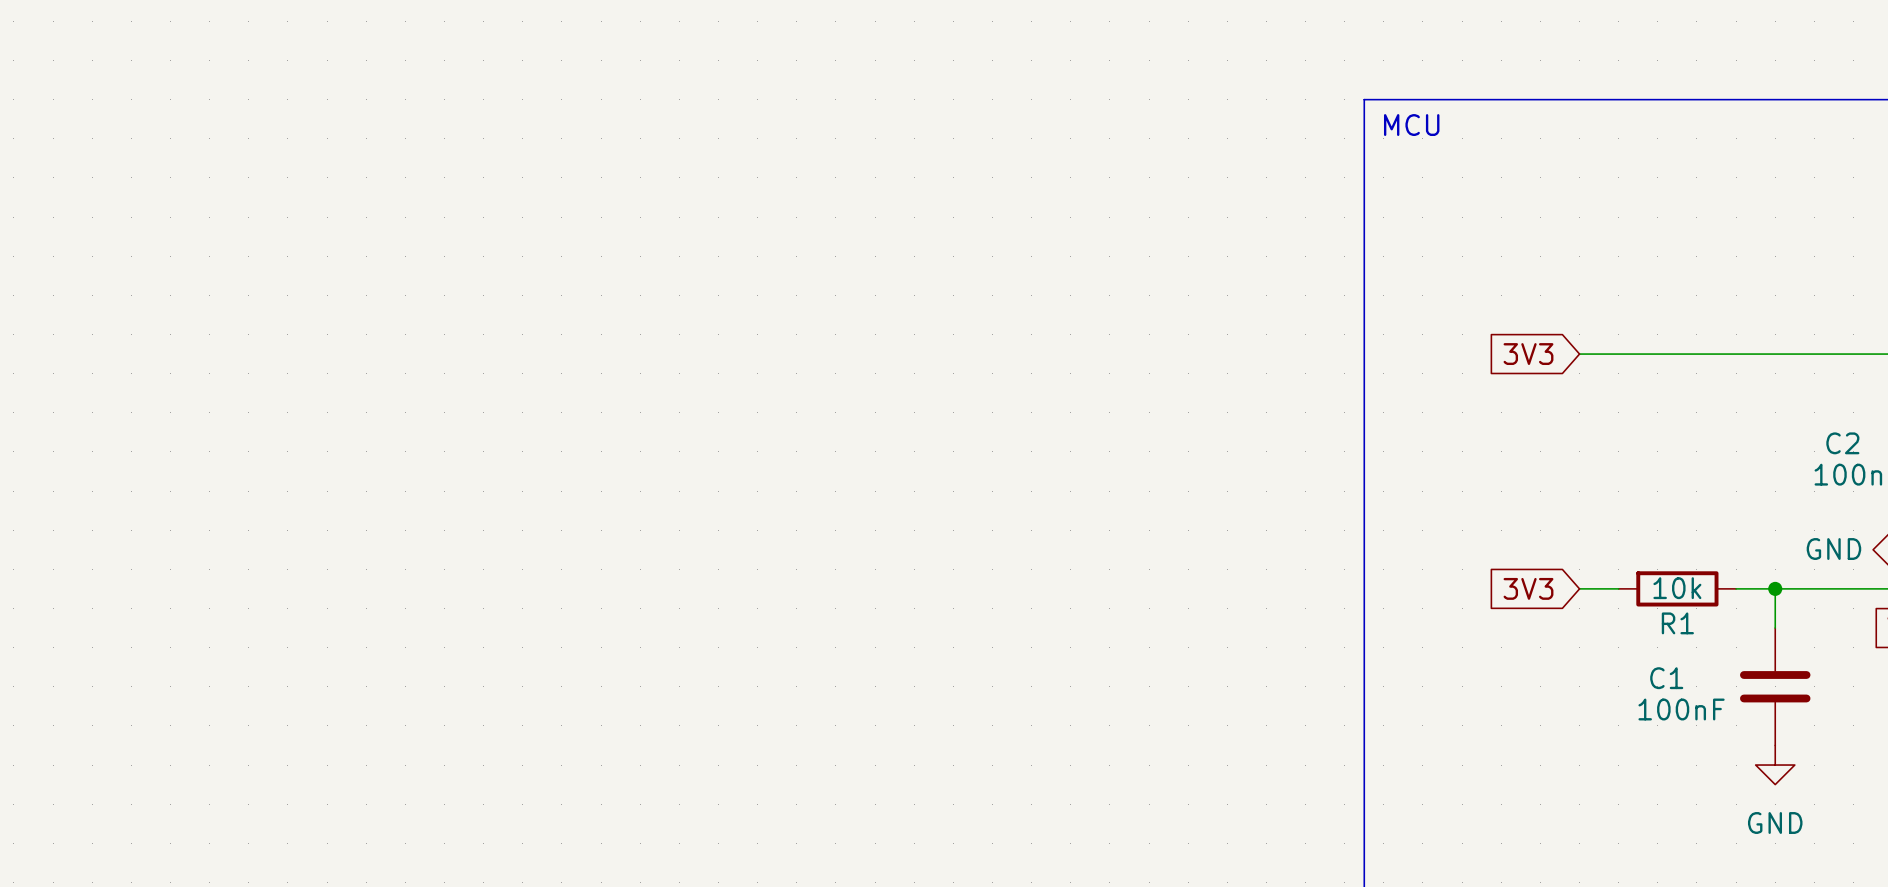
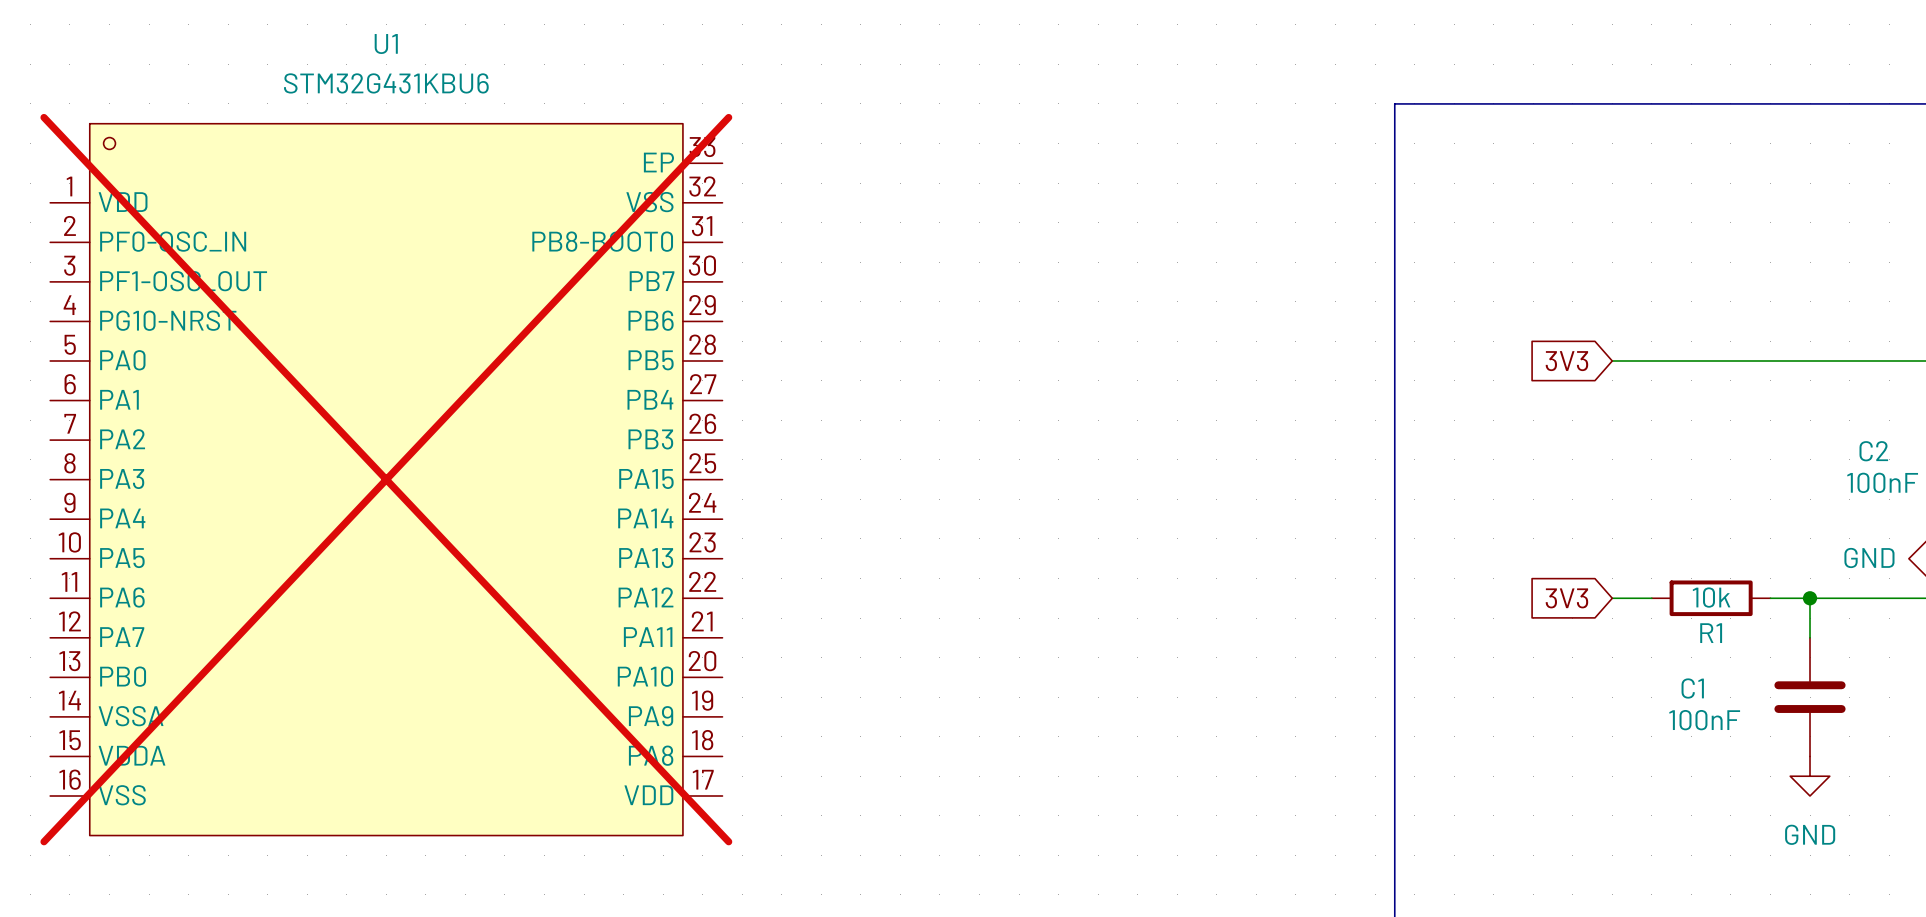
text: MCU (1411, 125) -> none
U1: none -> STM32G431KBU6 (386, 479)

